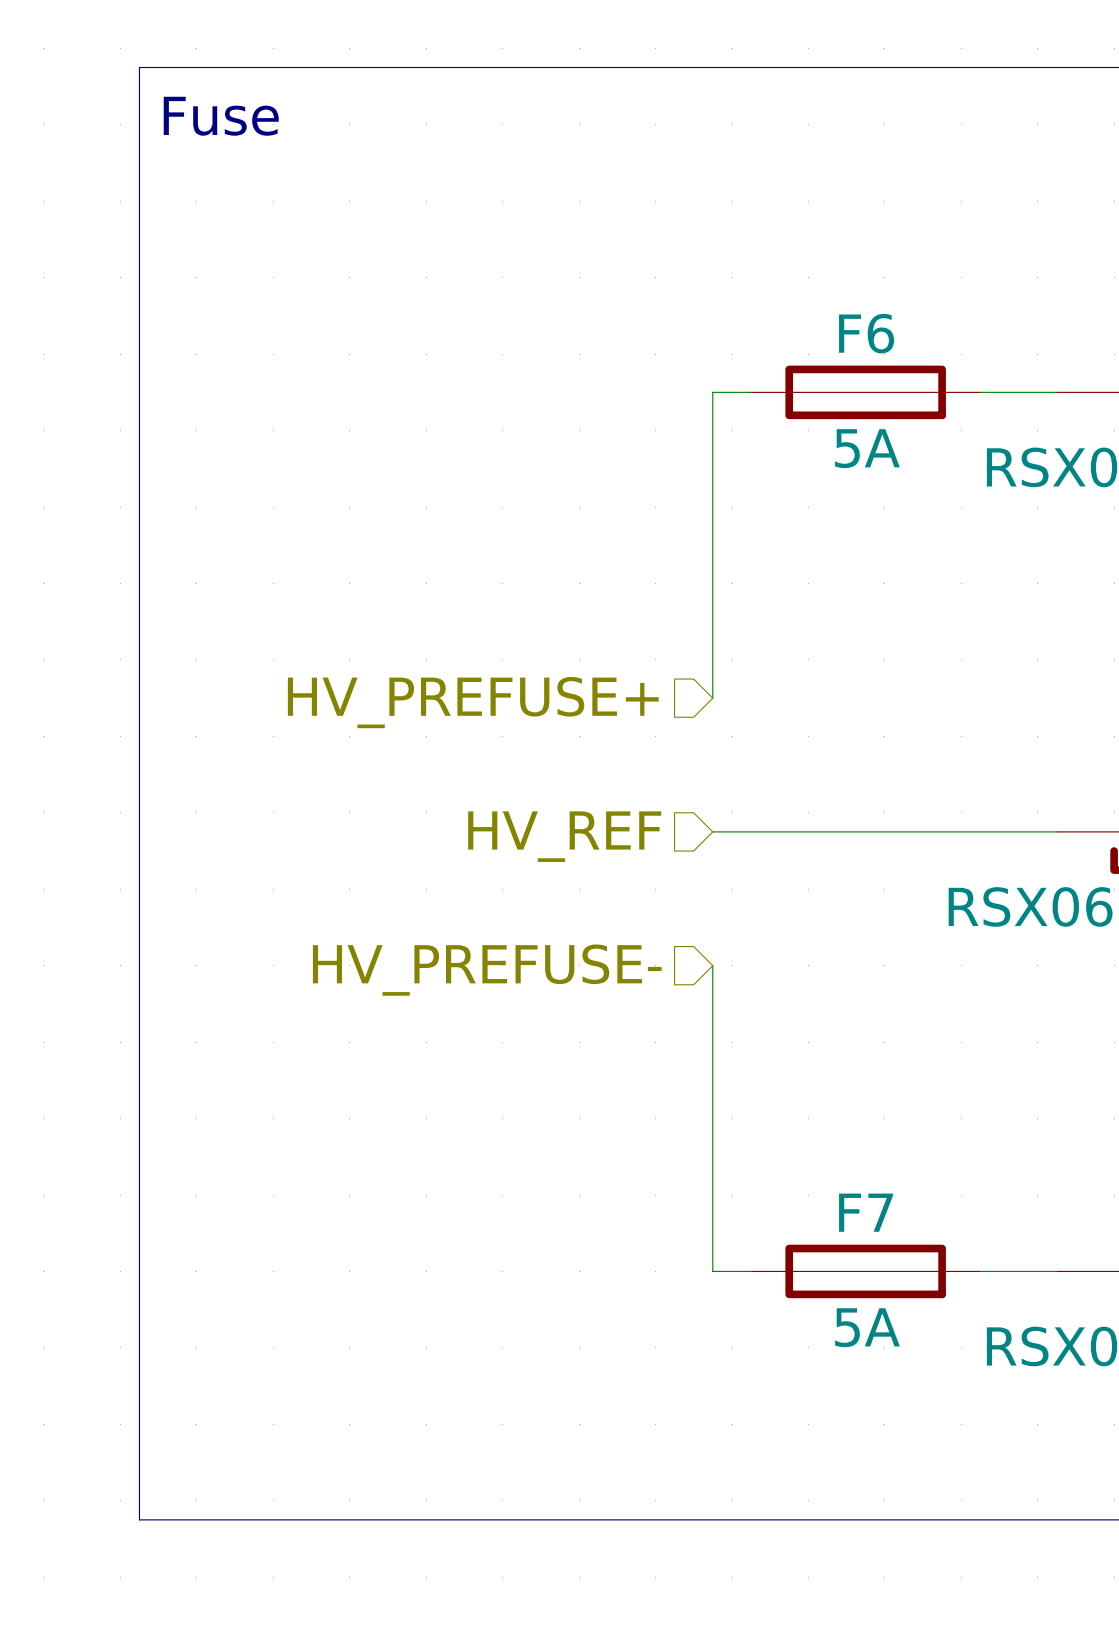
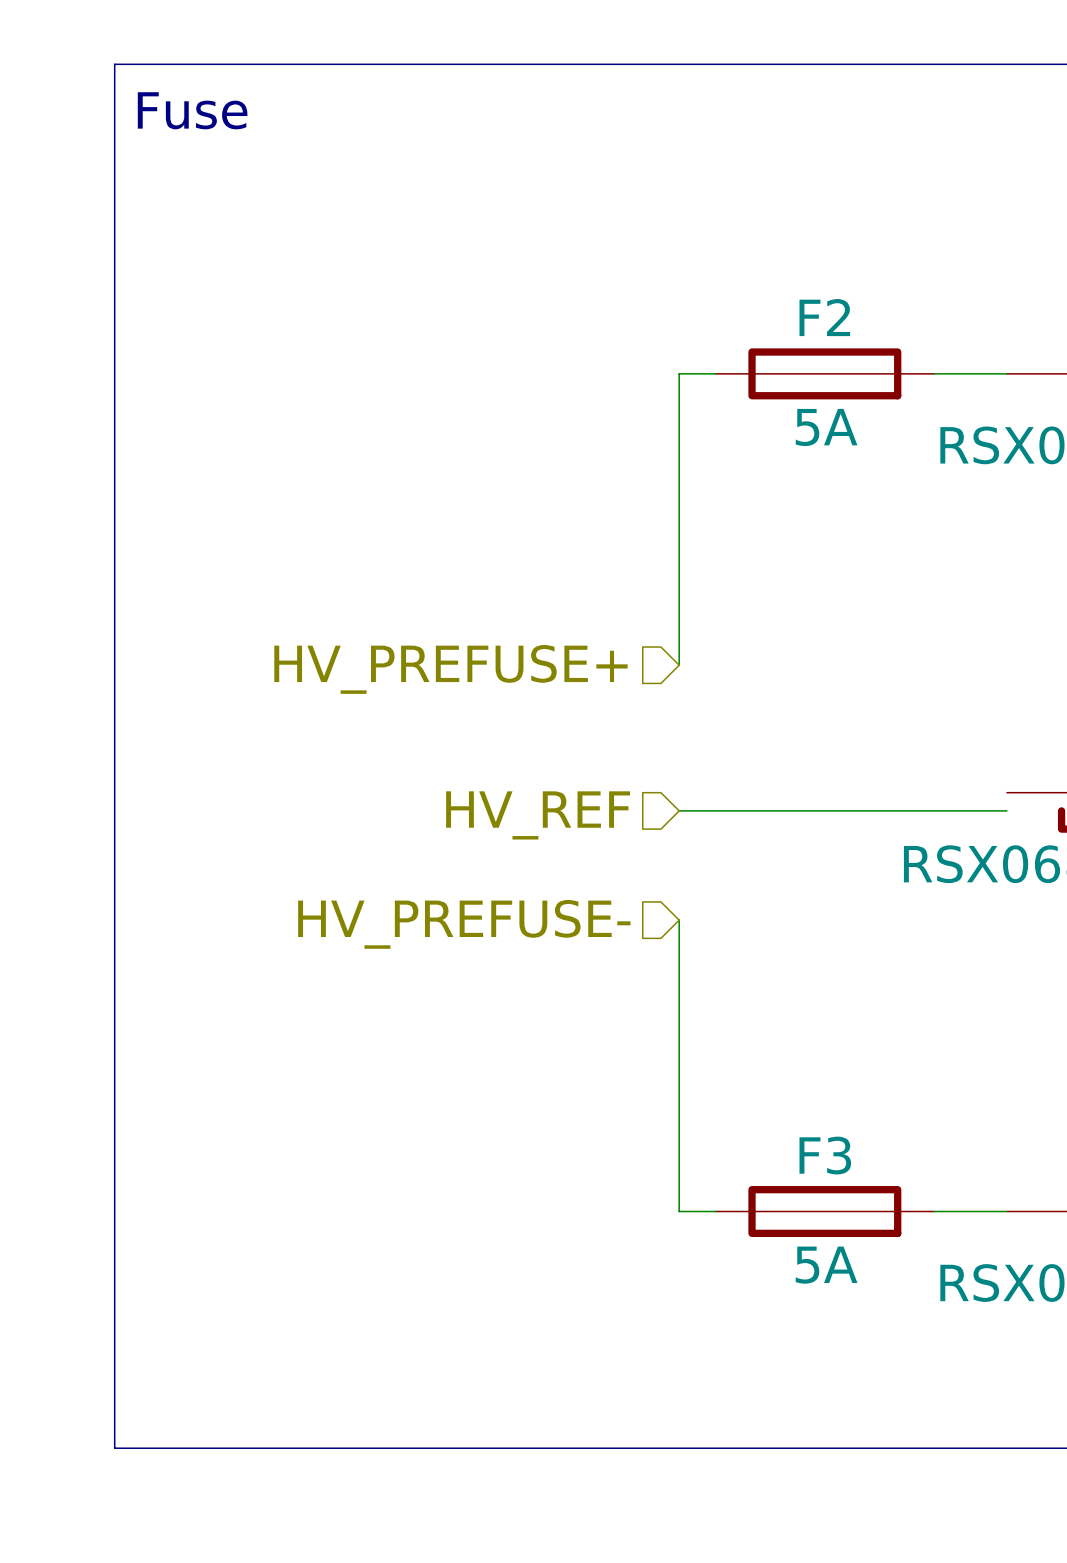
line: (139, 67) (139, 1519) -> (132, 64) (114, 64) (114, 1448) (132, 1448)
text position: Fuse (221, 116) -> Fuse (192, 110)
F6 name: F6 (866, 333) -> F2 (824, 317)
wire: (712, 831) (1056, 831) -> (679, 810) (1006, 810)
hierarchical label position: HV_REF (564, 836) -> HV_REF (538, 815)
F7 name: F7 (865, 1212) -> F3 (825, 1155)

